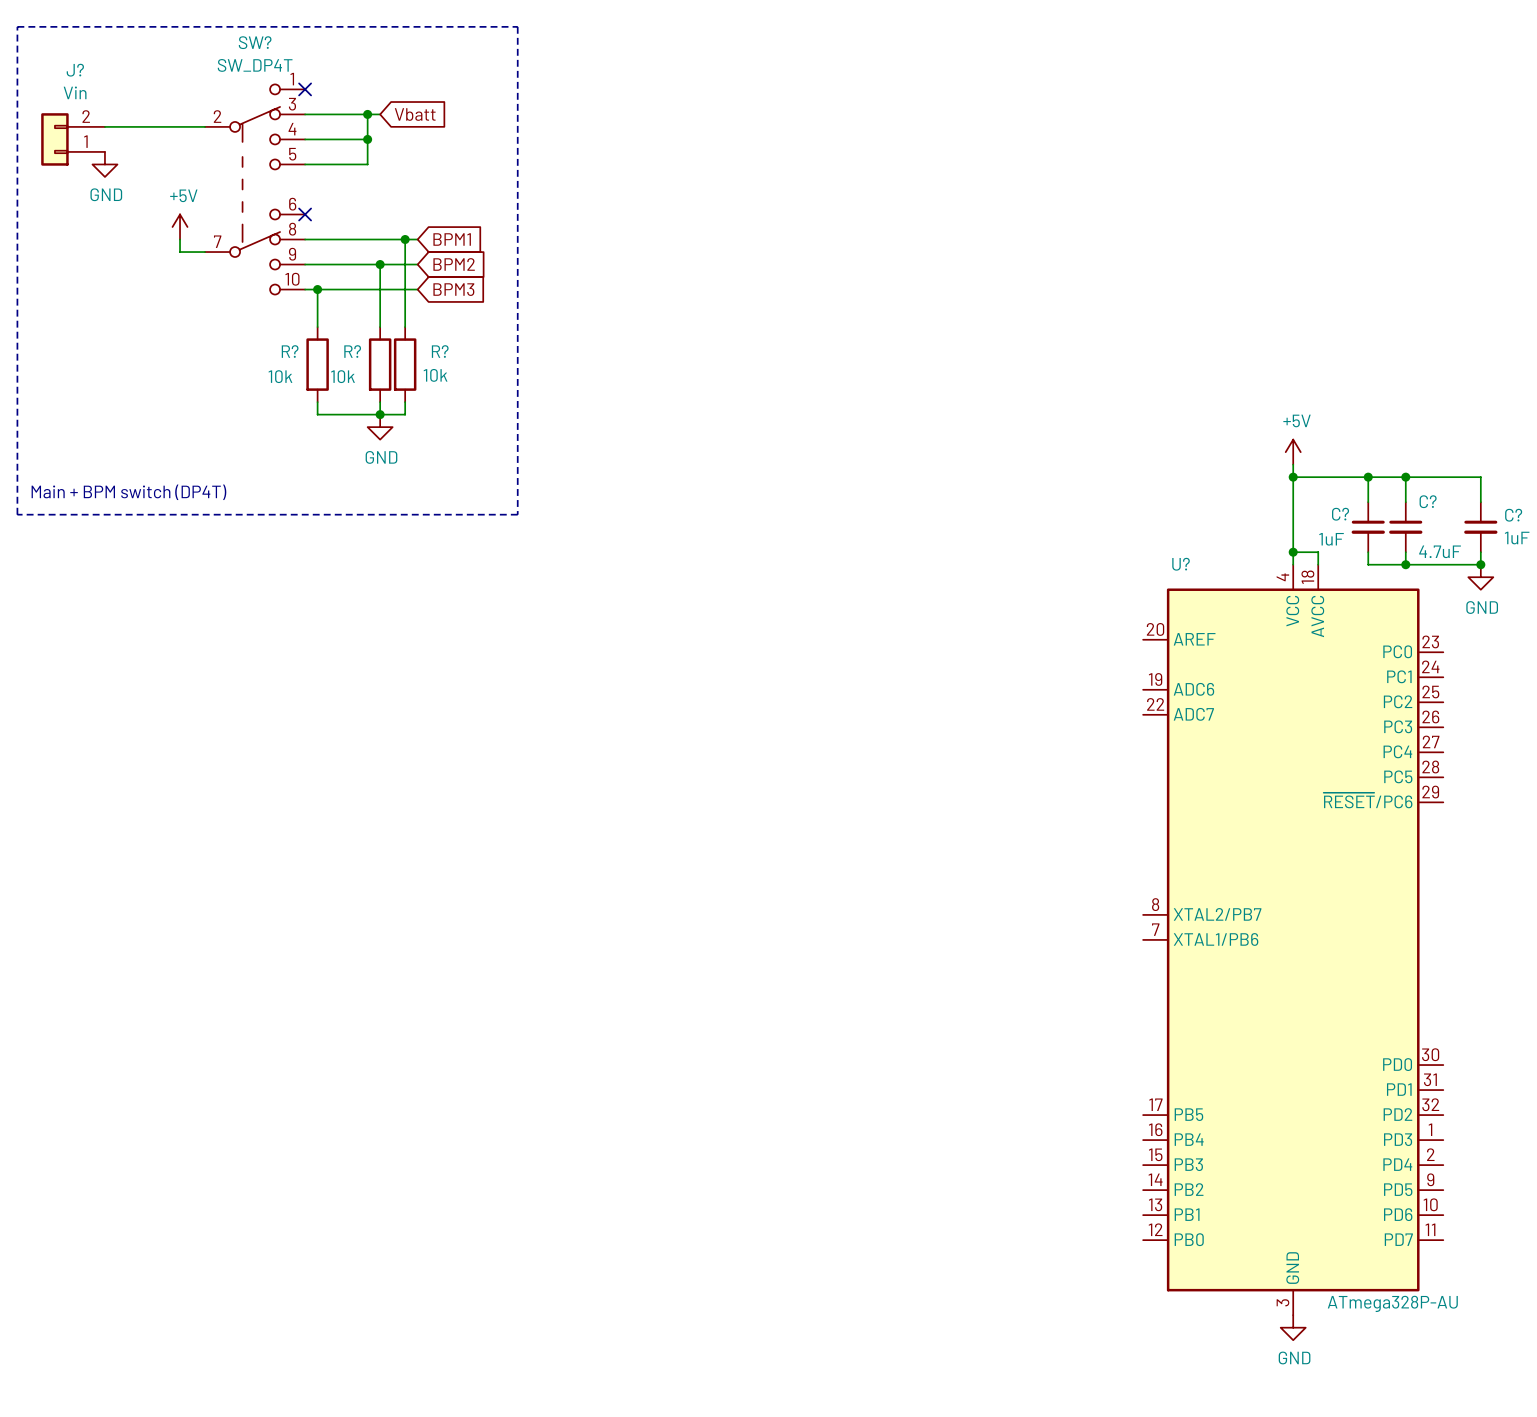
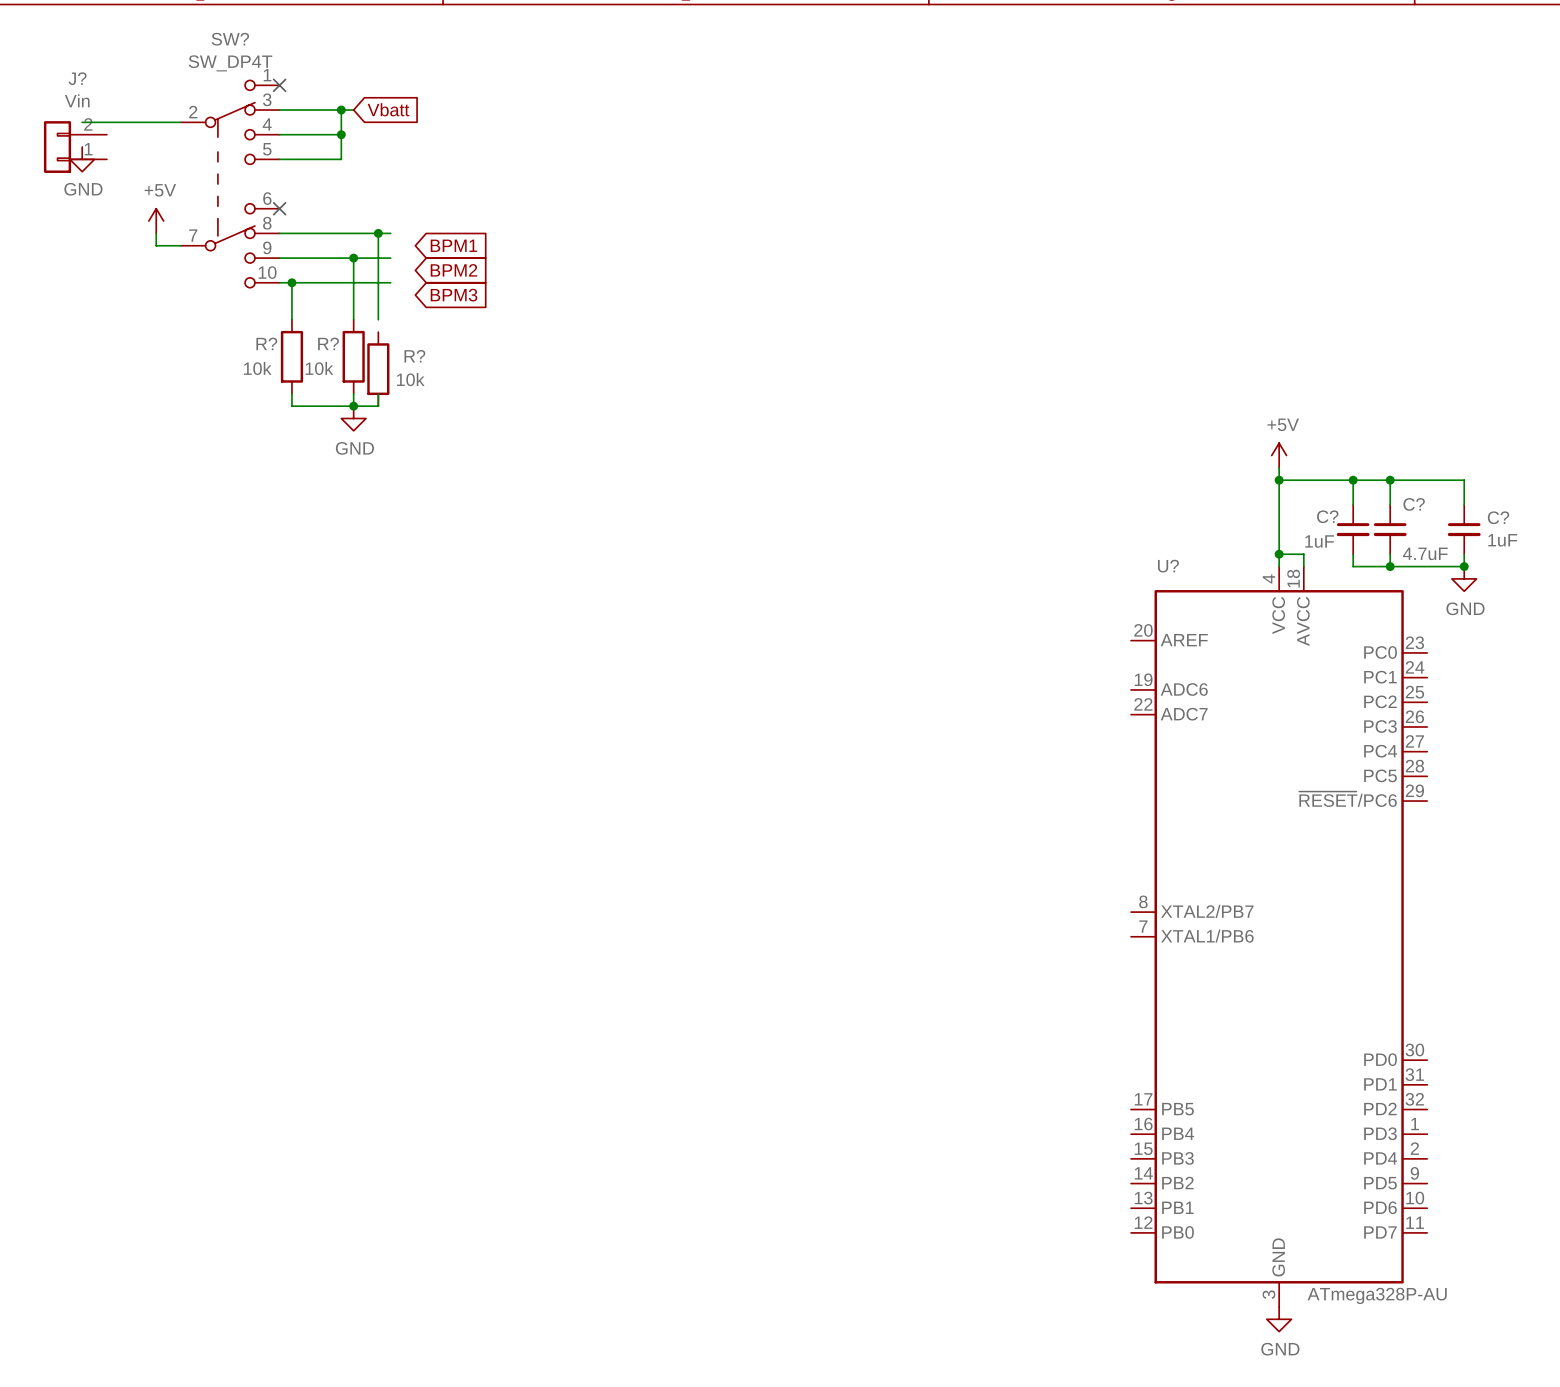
line: (17, 26) (517, 26) (517, 514) (17, 514) (17, 26) -> none
no-connect mark position: (305, 89) -> (279, 85)
junction: none -> (341, 110)
wire: (305, 114) (380, 114) -> (279, 110) (353, 110)
wire: (367, 114) (367, 164) (305, 164) -> (341, 110) (341, 159) (279, 159)
junction: (367, 114) -> none
global label position: Vbatt (415, 114) -> Vbatt (388, 109)
wire: (104, 126) (205, 126) -> (82, 122) (180, 122)
junction: none -> (341, 134)
wire: (305, 139) (367, 139) -> (279, 134) (341, 134)
junction: (367, 139) -> none
power symbol position: GND (104, 164) -> GND (82, 159)
SW? position: (255, 189) -> (230, 184)
no-connect mark position: (305, 214) -> (279, 208)
power symbol position: +5V (180, 227) -> +5V (156, 221)
wire: none -> (378, 233) (378, 270)
junction: none -> (378, 233)
wire: (180, 239) (180, 252) (205, 252) -> (180, 245) (156, 245) (156, 233)
wire: (305, 239) (417, 239) -> (279, 233) (390, 233)
wire: (405, 239) (405, 327) -> none
junction: (405, 239) -> none
wire: none -> (353, 258) (353, 319)
junction: none -> (353, 258)
wire: (305, 264) (417, 264) -> (279, 258) (390, 258)
junction: (380, 264) -> none
junction: none -> (291, 282)
wire: (305, 289) (417, 289) -> (279, 282) (390, 282)
wire: (317, 289) (317, 327) -> (291, 282) (291, 319)
junction: (317, 289) -> none
wire: (380, 314) (380, 327) -> none
R? name position: R? (352, 351) -> R? (414, 356)
R?: none -> 10k (291, 356)
R?: none -> 10k (353, 356)
R?: 10k (317, 364) -> none
R?: 10k (405, 364) -> none
R? value position: 10k (343, 376) -> 10k (410, 379)
wire: (317, 402) (317, 414) (405, 414) (405, 402) -> (291, 393) (291, 406) (378, 406) (378, 393)
wire: (380, 402) (380, 414) -> (353, 393) (353, 406)
junction position: (380, 414) -> (353, 406)
power symbol position: GND (380, 427) -> GND (353, 418)
text: Main + BPM switch (DP4T) (128, 492) -> none

